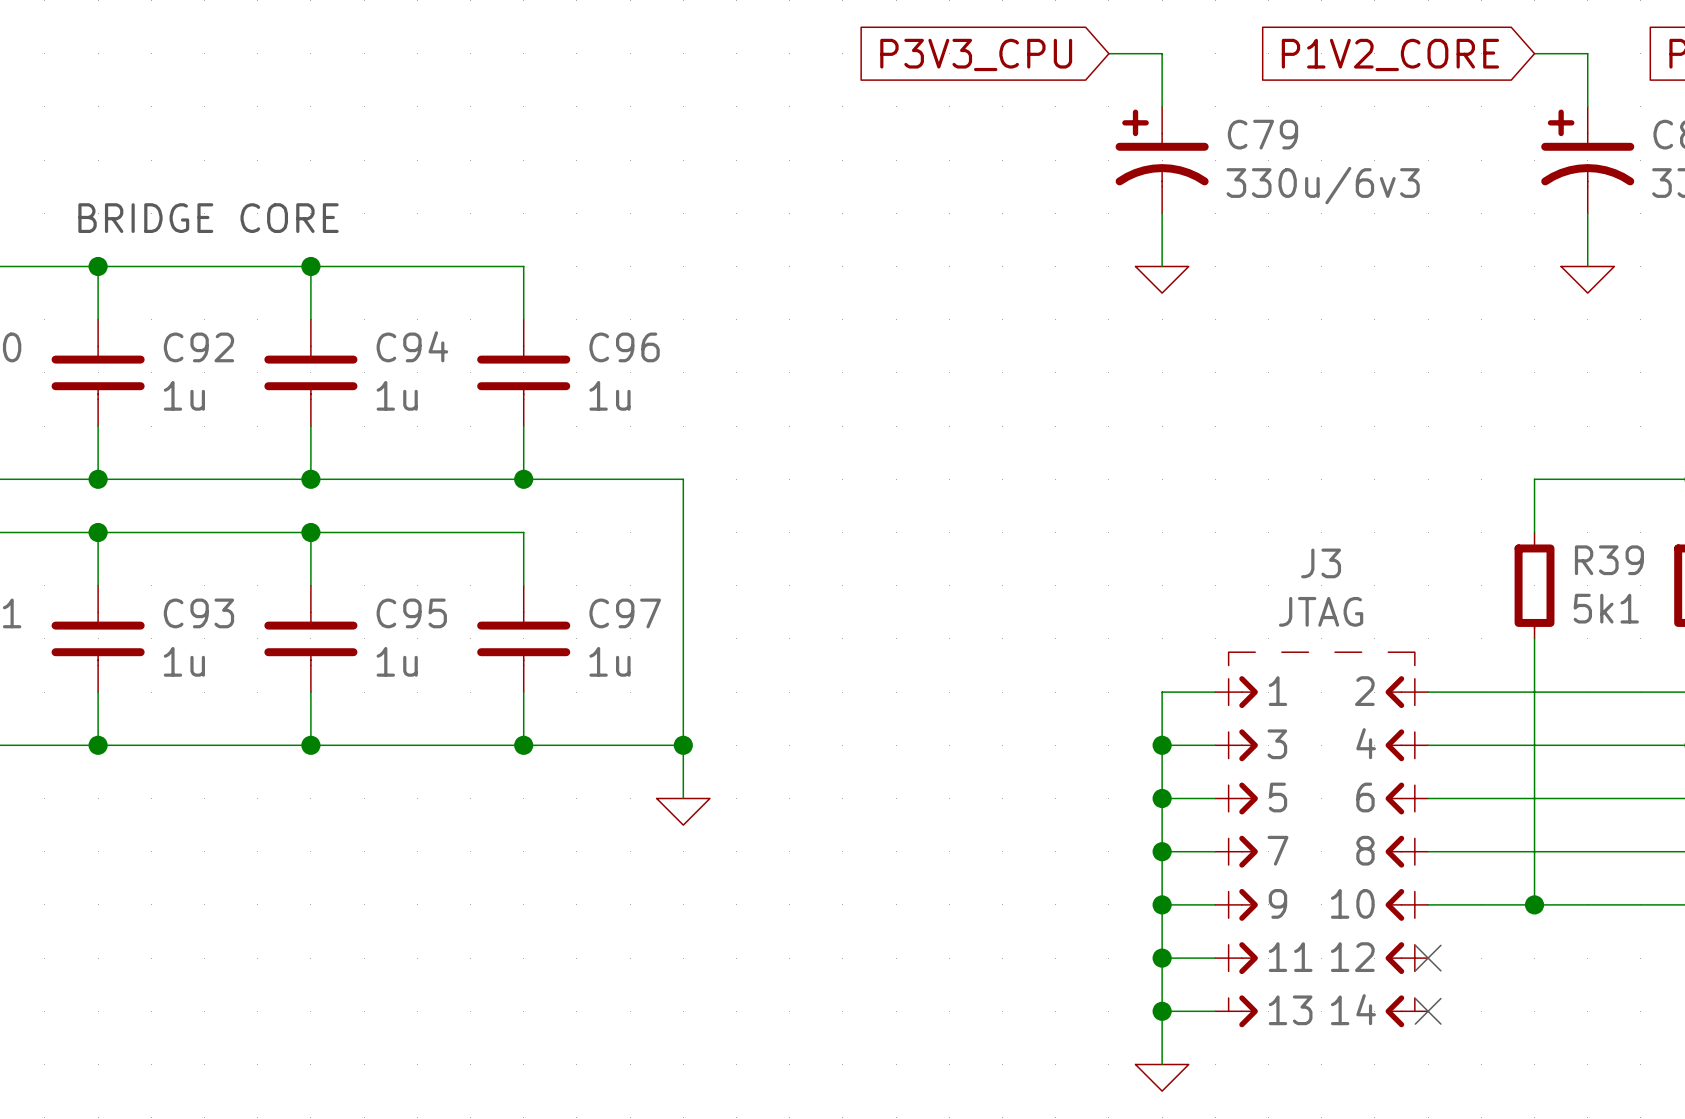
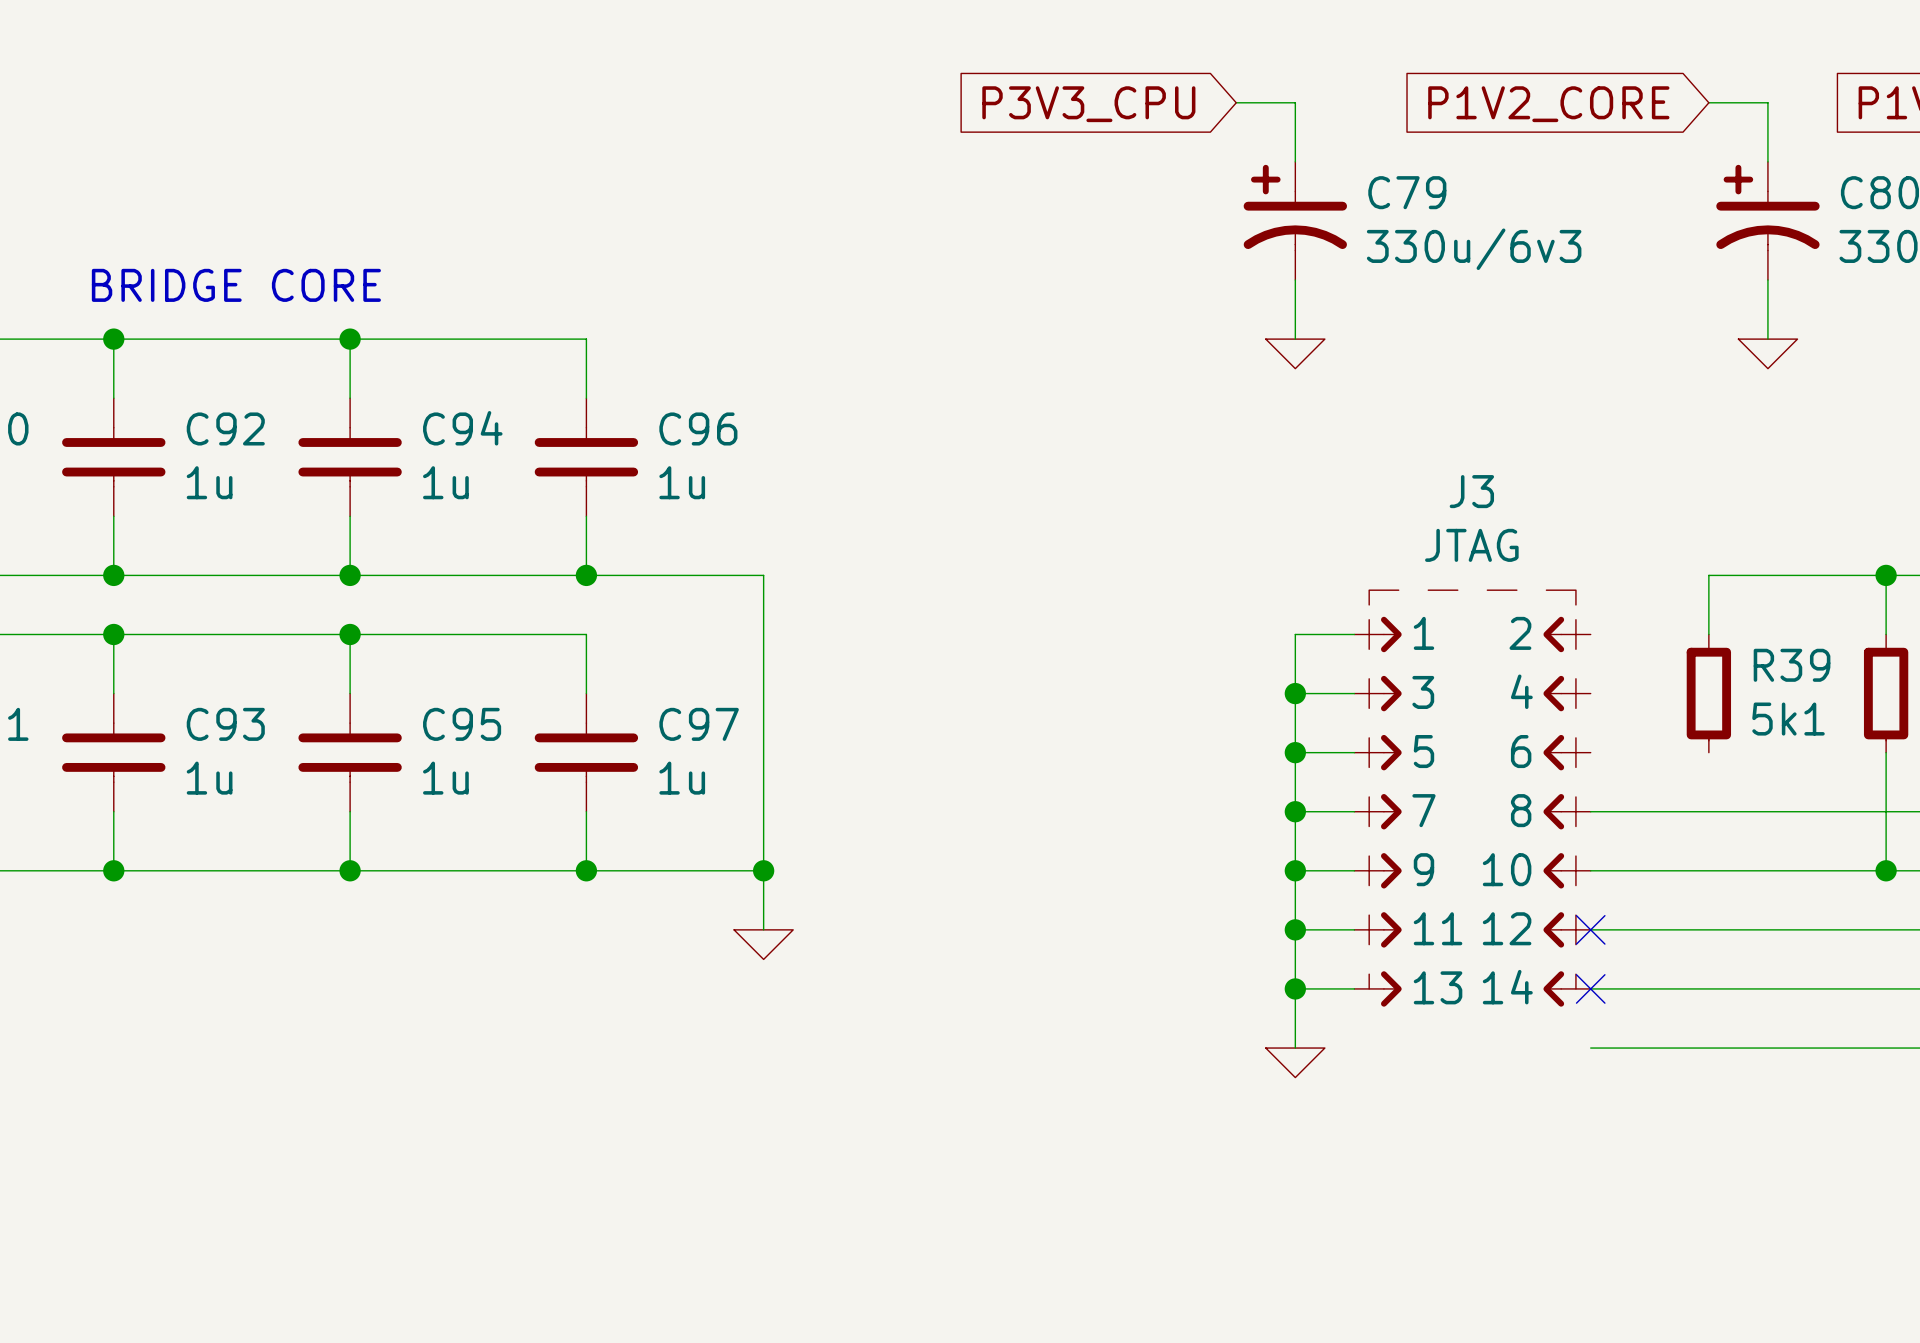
junction: none -> (1295, 693)
junction: none -> (1295, 752)
wire: (1534, 638) (1534, 904) -> none
junction: none -> (1295, 811)
no-connect mark: none -> (1590, 929)
J3 position: (1321, 839) -> (1472, 798)
no-connect mark: none -> (1590, 988)
junction: (1162, 904) -> none
wire: (1215, 904) (1162, 904) (1162, 1064) -> (1354, 634) (1295, 634) (1295, 811)
junction: (1534, 904) -> none
wire: (1162, 958) (1215, 958) -> (1295, 693) (1354, 693)
junction: (1162, 958) -> none
no-connect mark: (1428, 958) -> none
wire: (1162, 1011) (1215, 1011) -> (1295, 752) (1354, 752)
junction: (1162, 1011) -> none
no-connect mark: (1428, 1011) -> none
power symbol position: (1162, 1077) -> (1295, 1062)

